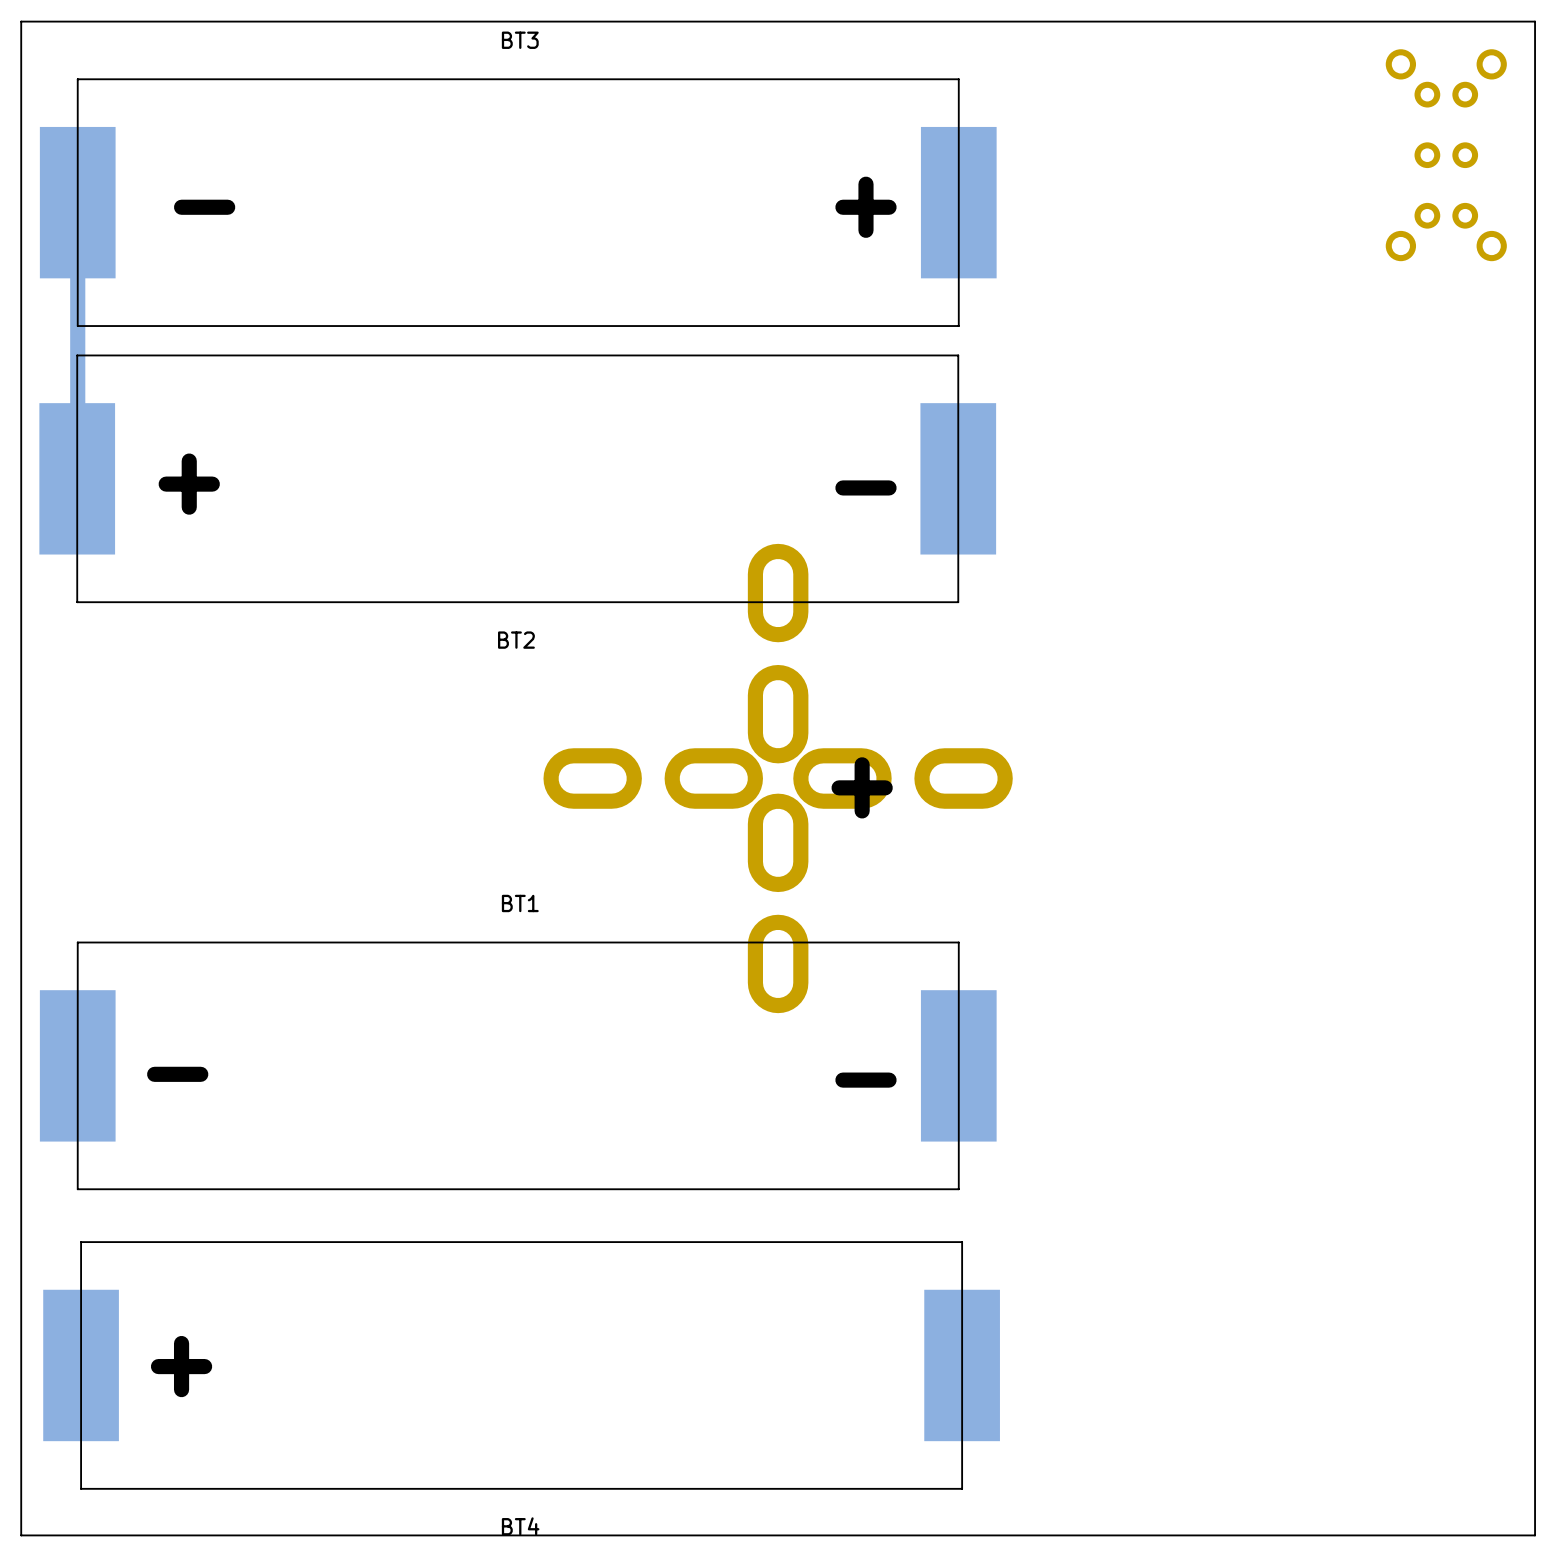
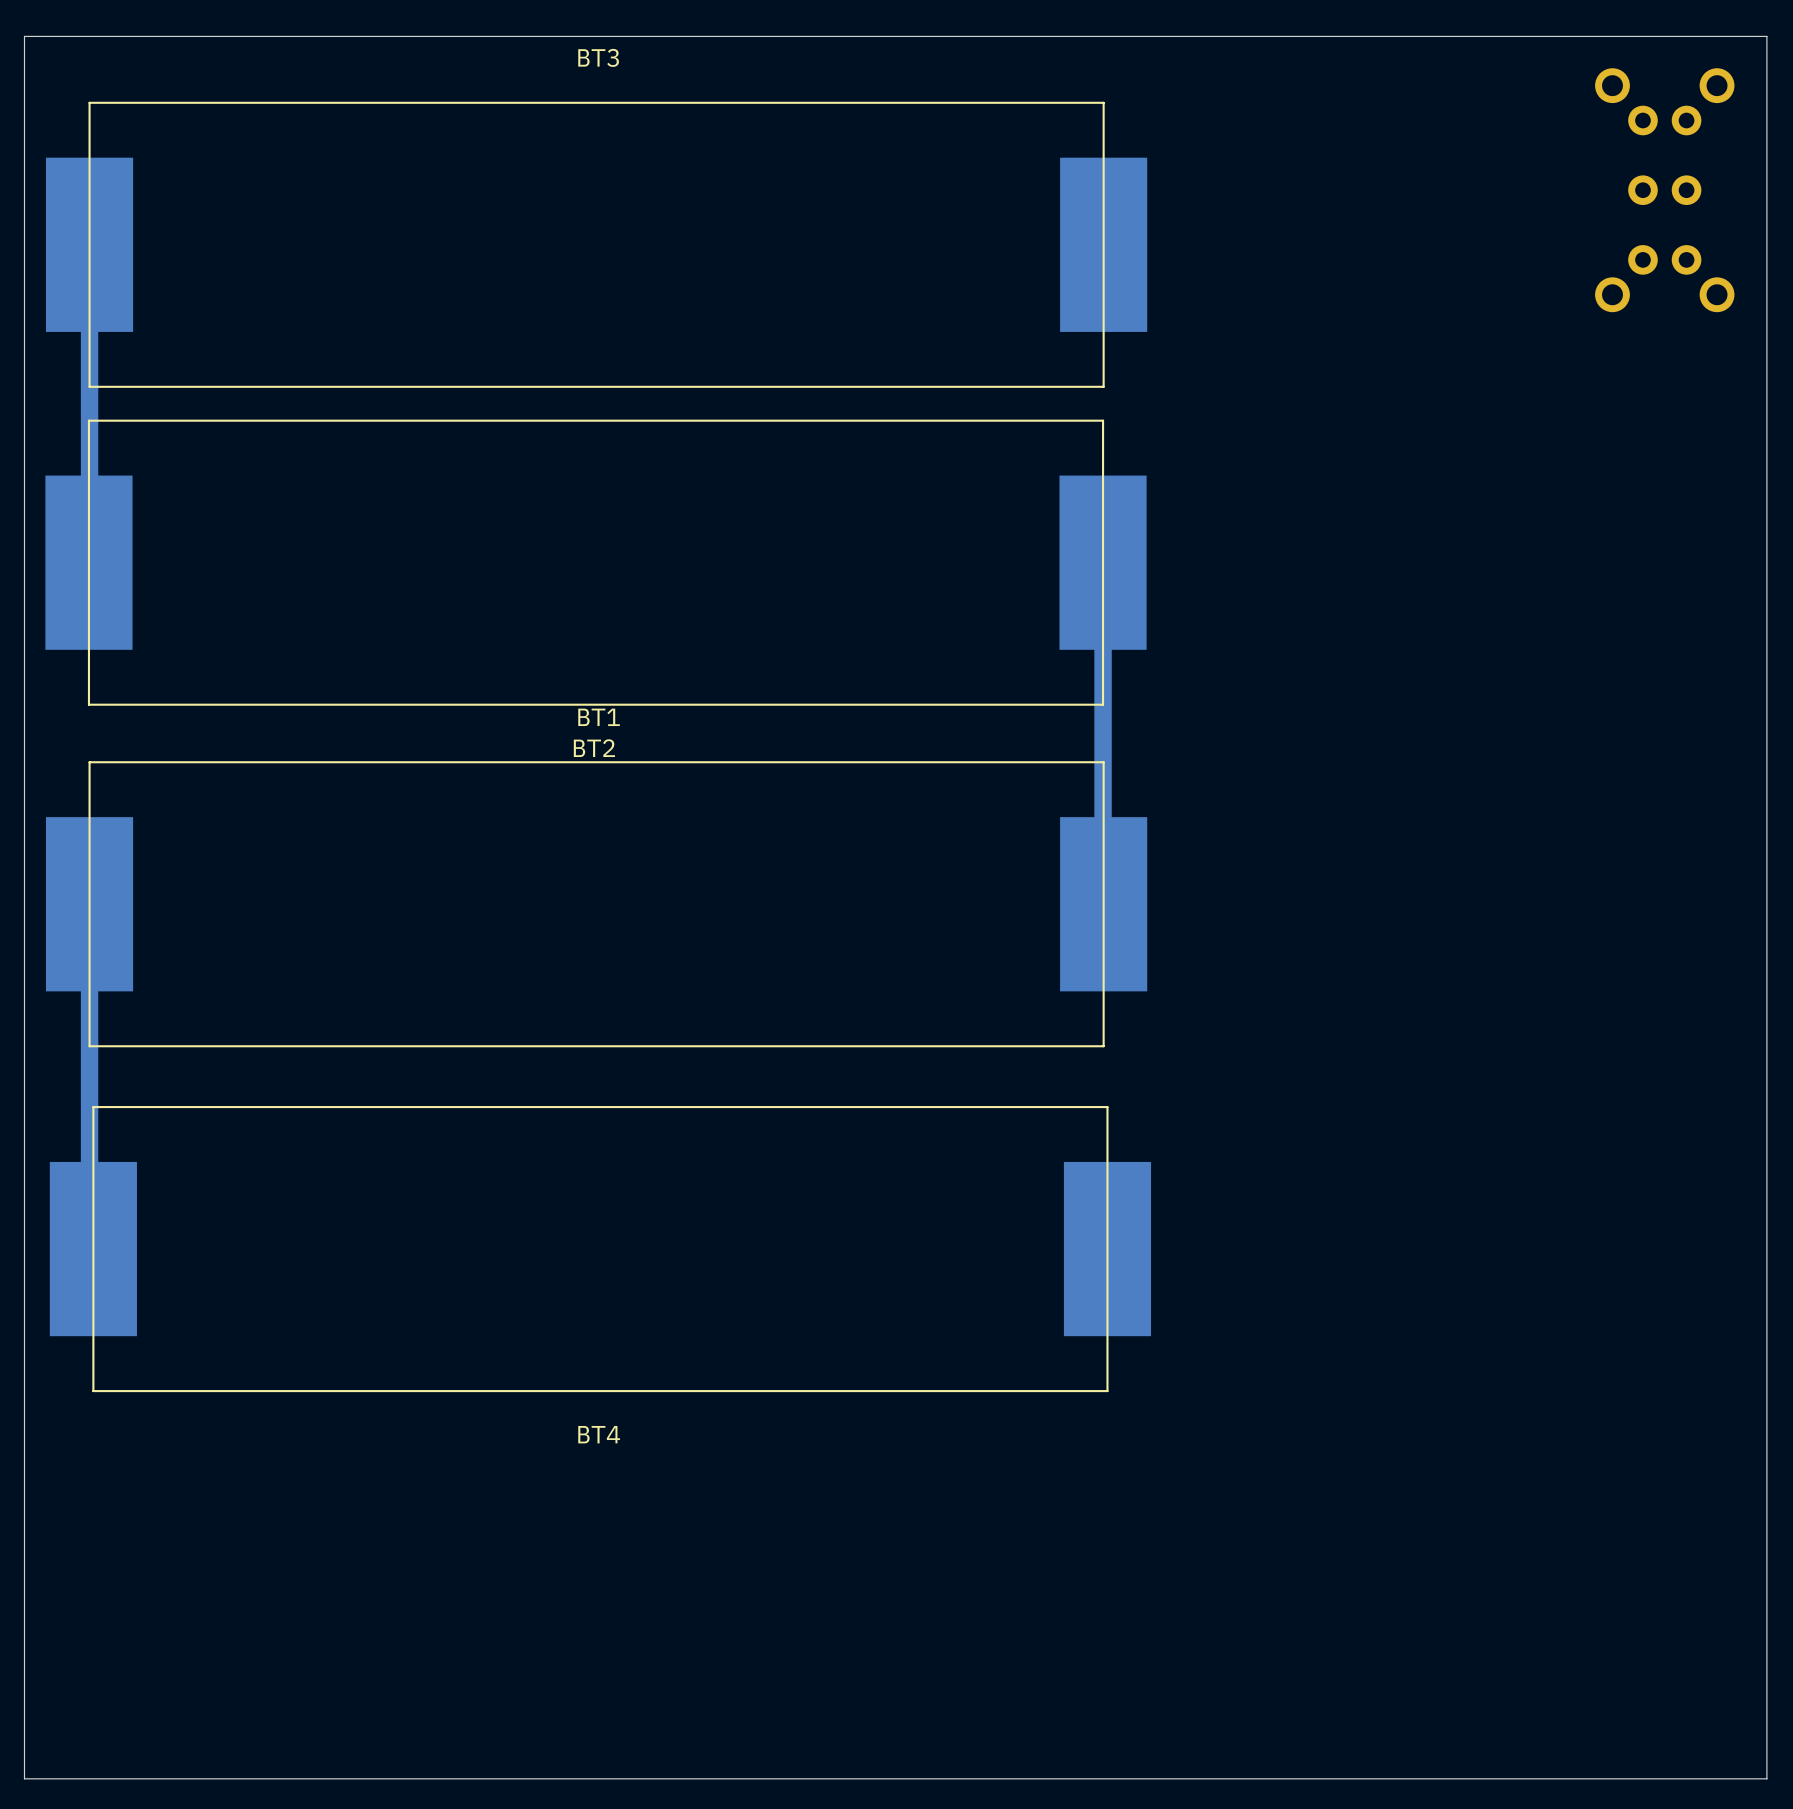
text: - (204, 207) -> none
text: + (865, 207) -> none
bottom track: none -> (1103, 562) (1103, 903)
text: + (189, 484) -> none
text: - (865, 487) -> none
bottom track: none -> (89, 904) (89, 1245) (93, 1249)
part: (778, 778) -> none
text: + (862, 787) -> none
BT1 position: (518, 1065) -> (596, 904)
text: - (177, 1074) -> none
text: - (865, 1080) -> none
BT4 position: (521, 1365) -> (600, 1249)
text: + (181, 1366) -> none

